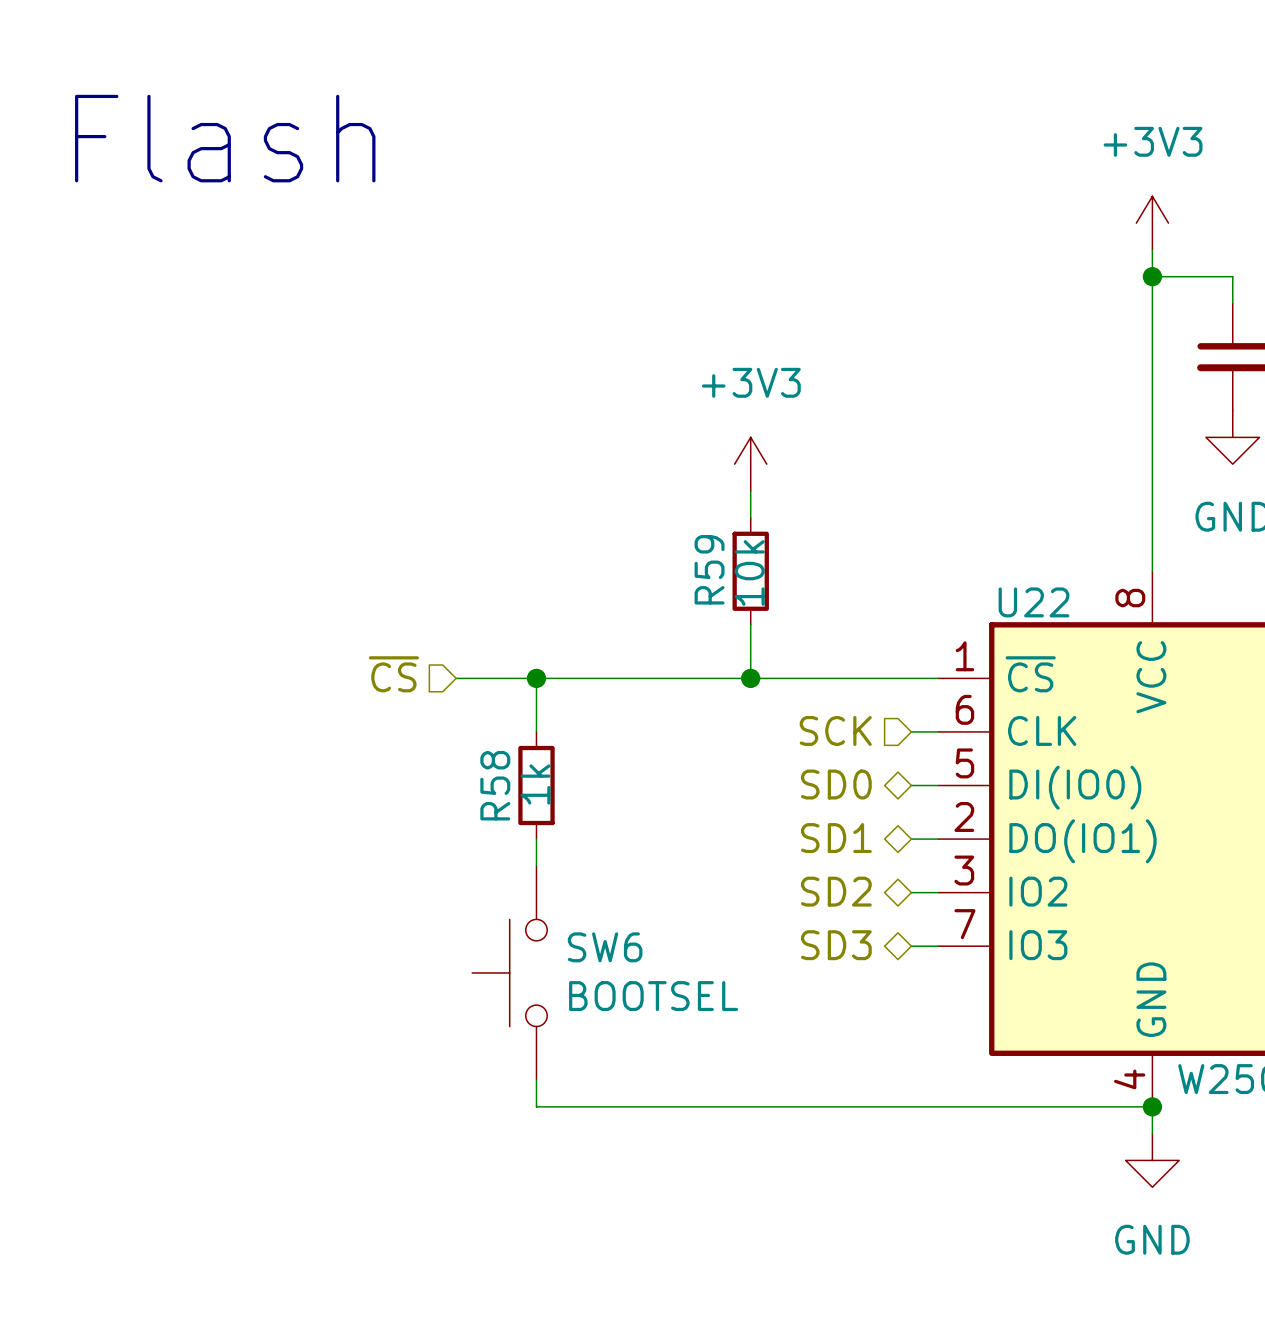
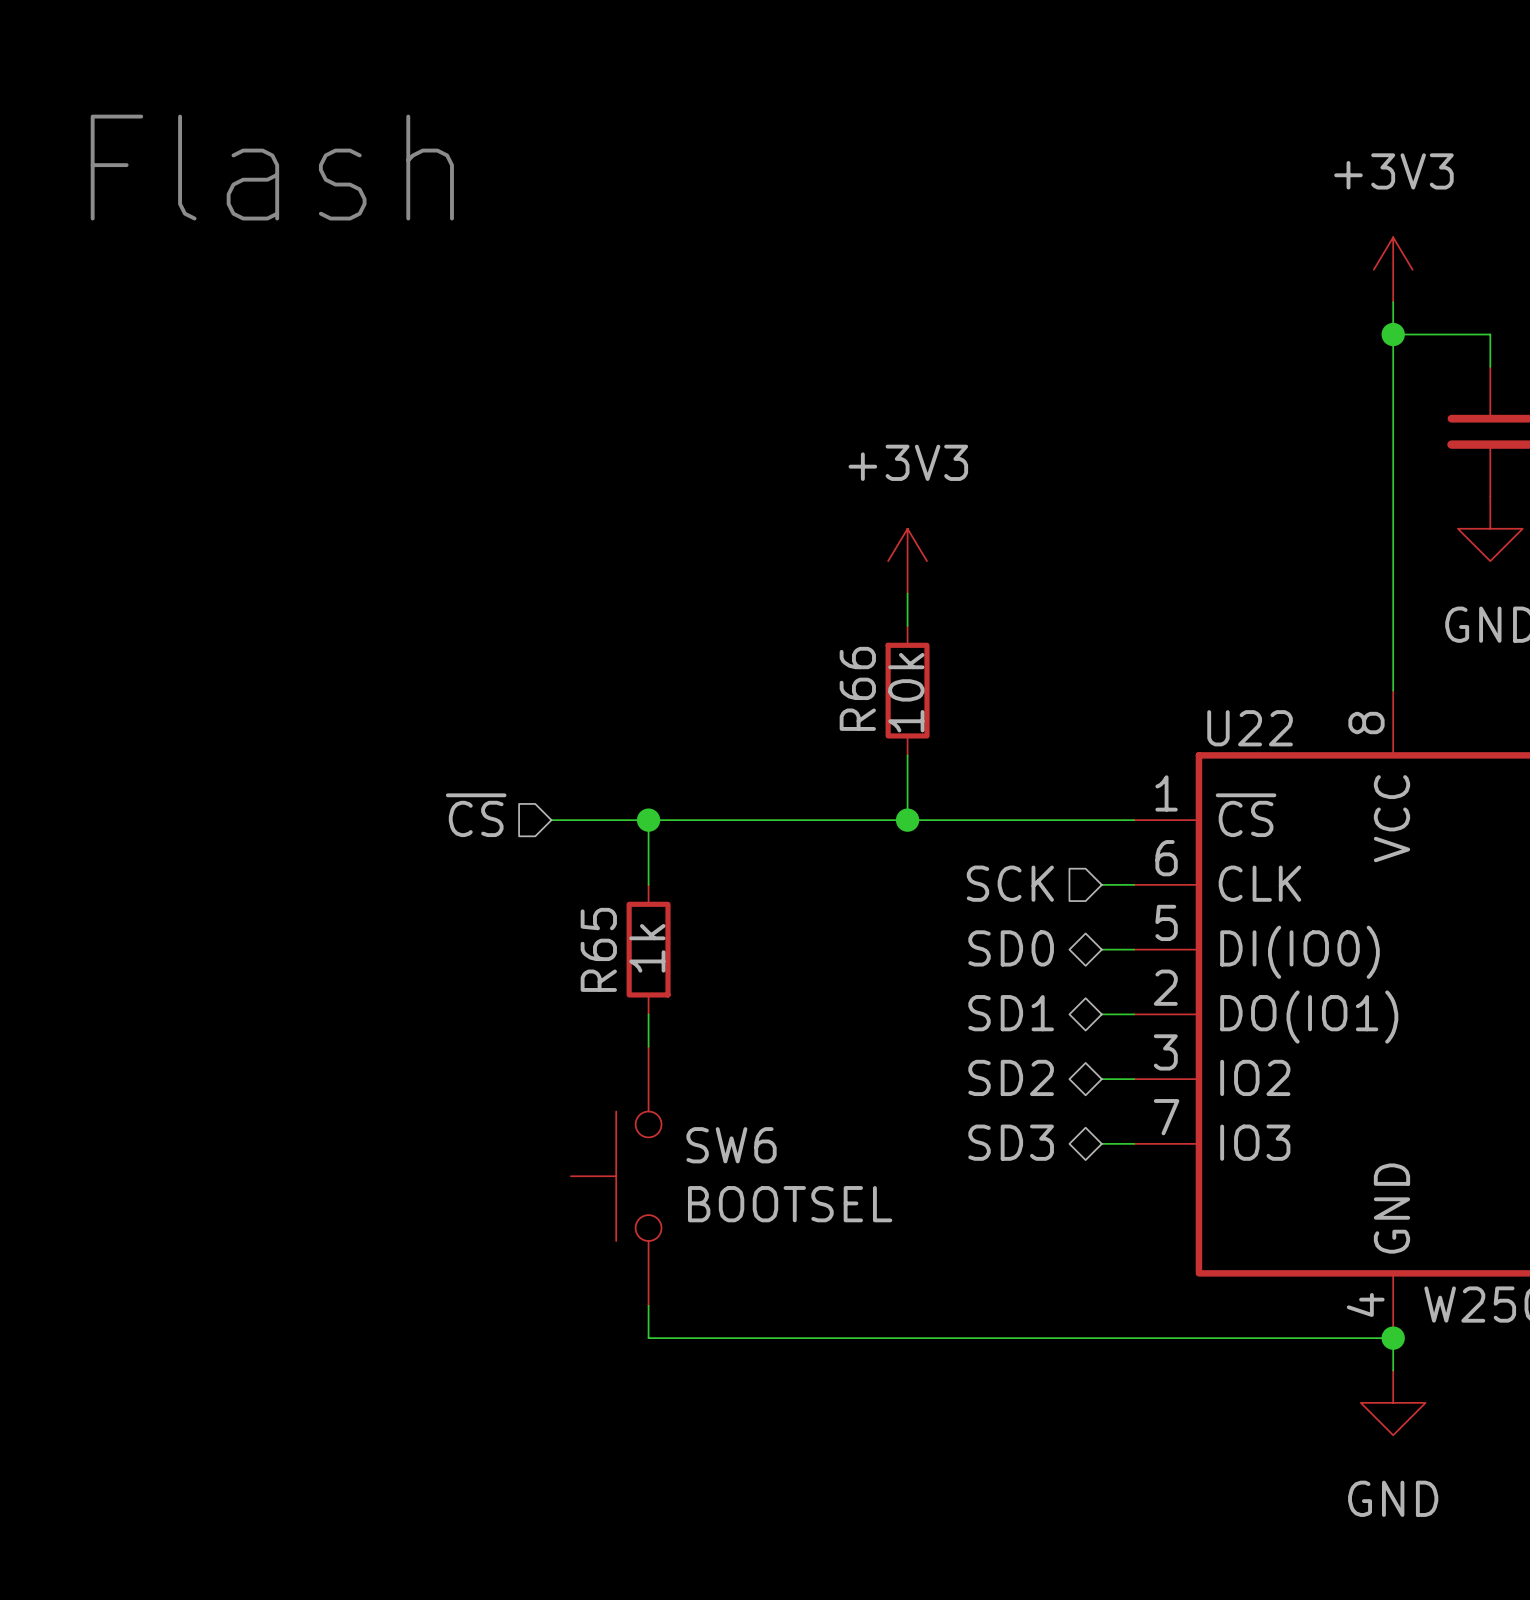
R59 name: R59 (709, 569) -> R66 (857, 688)
R58 name: R58 (495, 785) -> R65 (598, 949)

